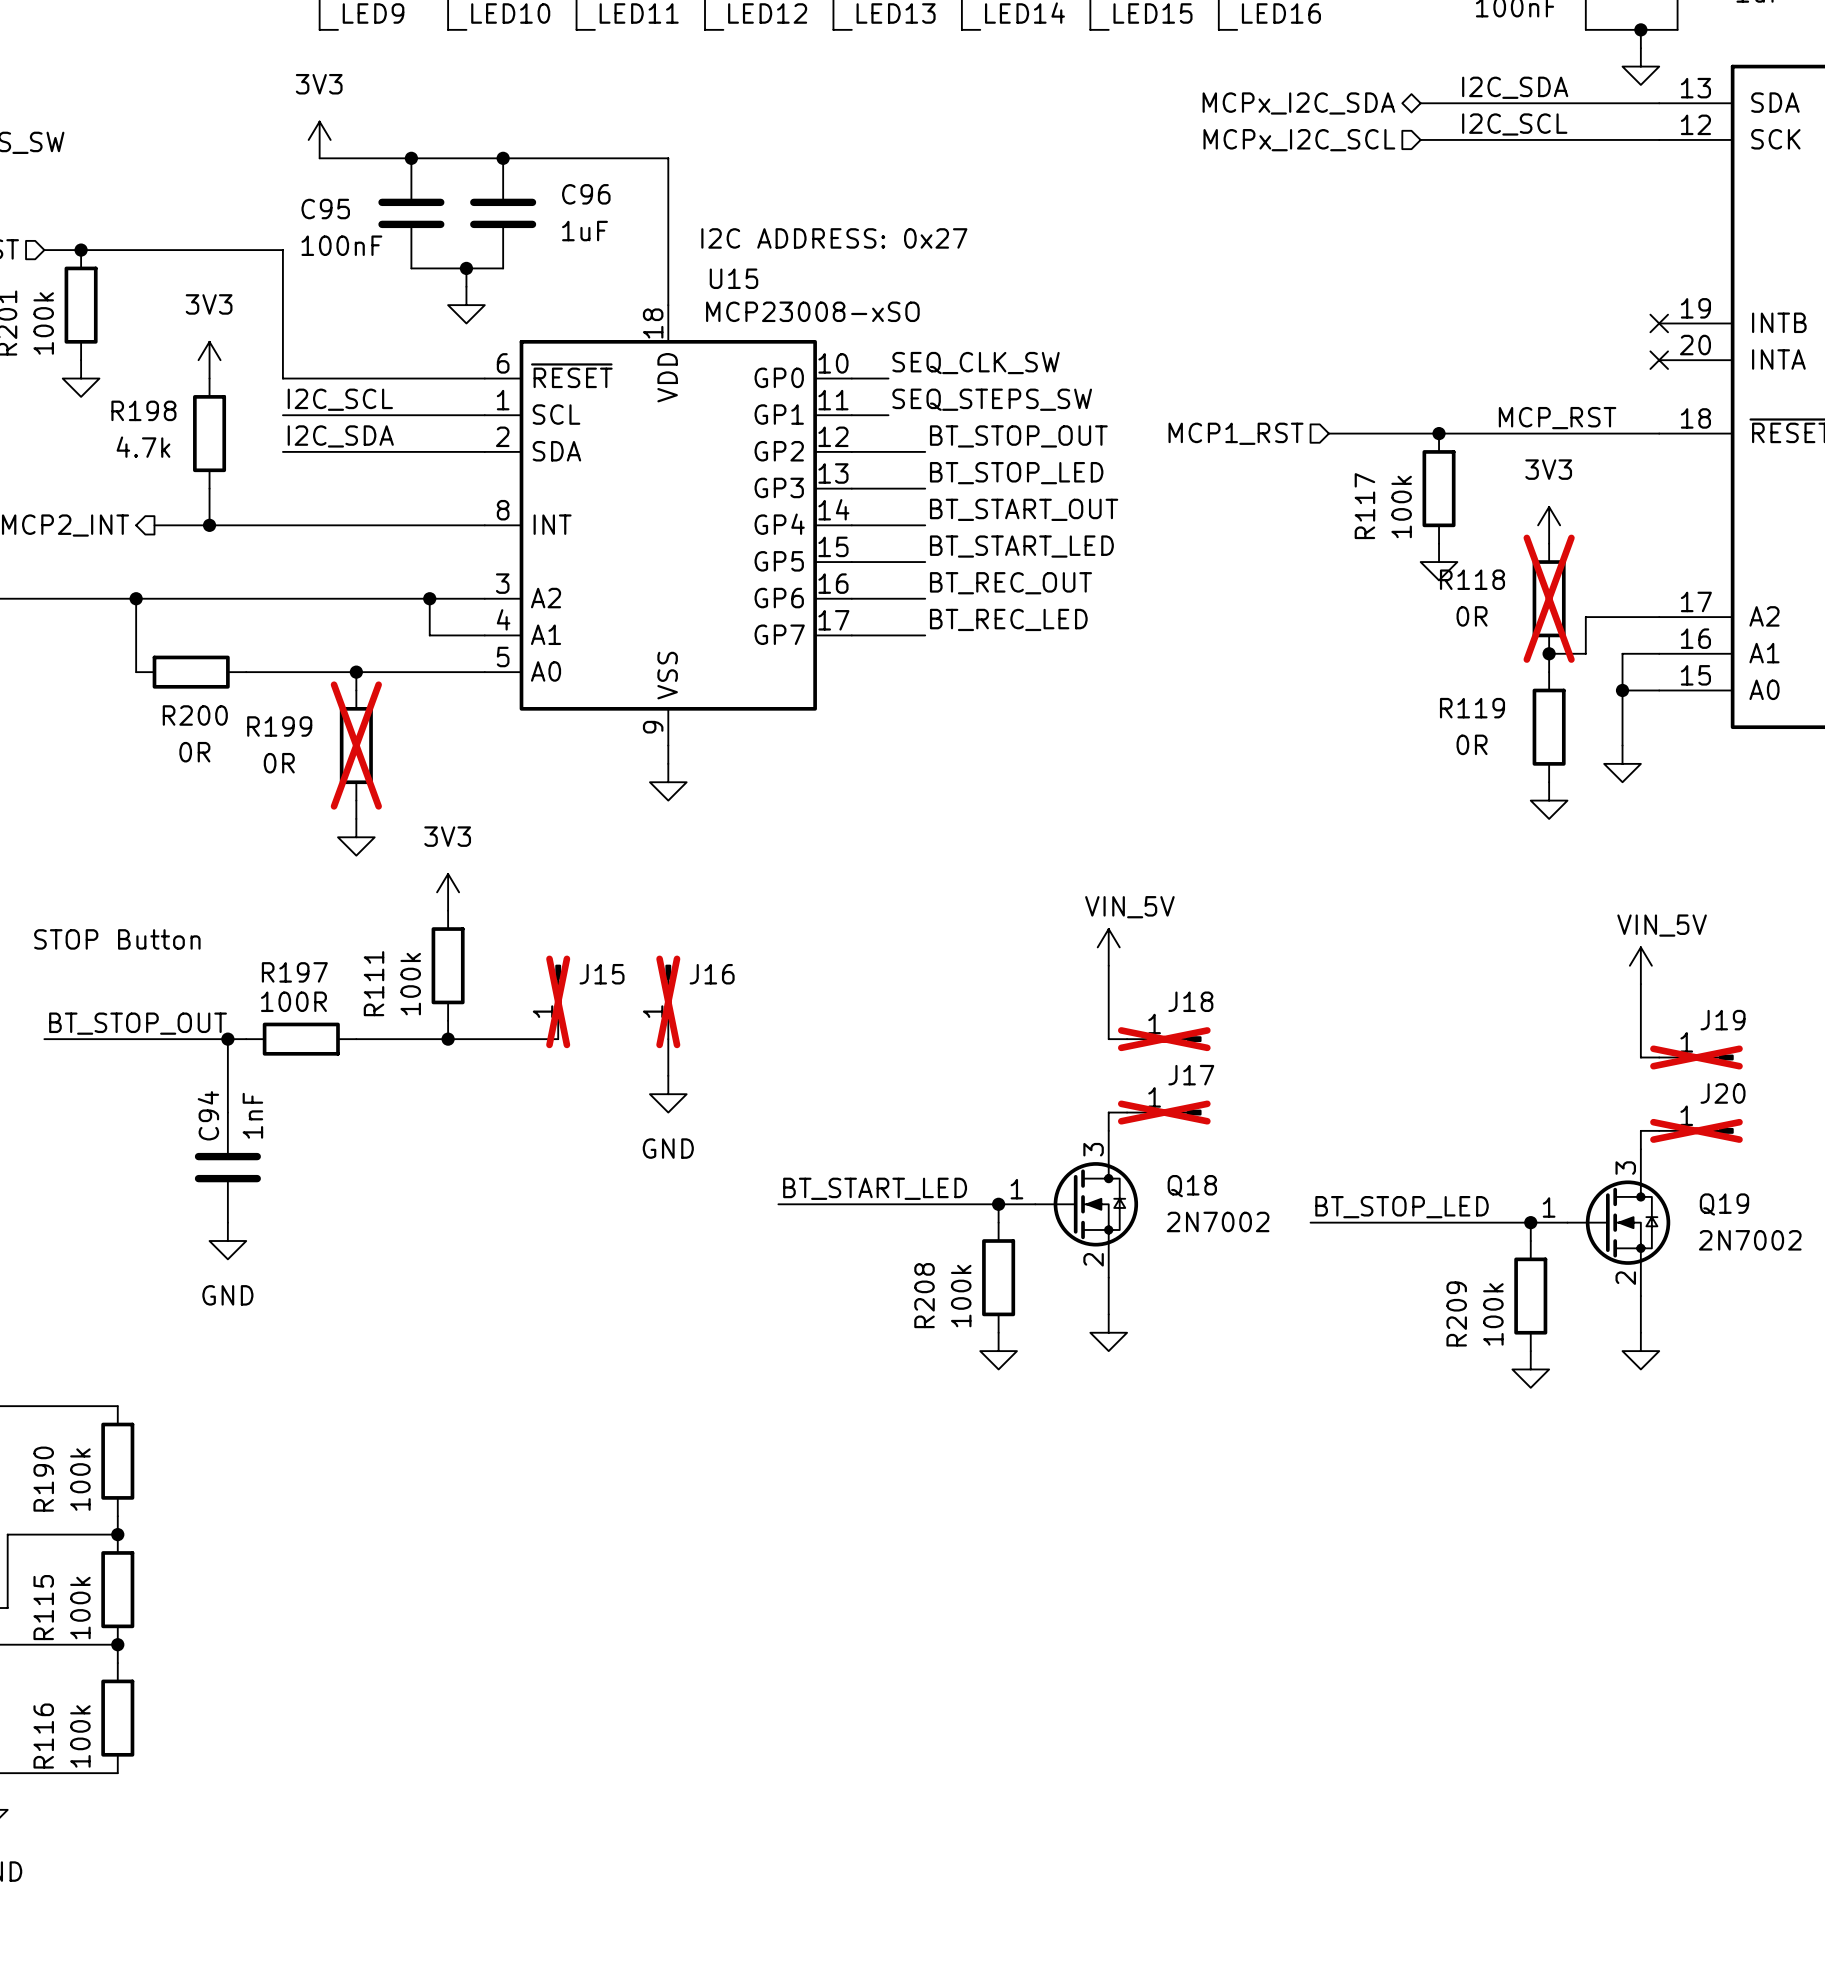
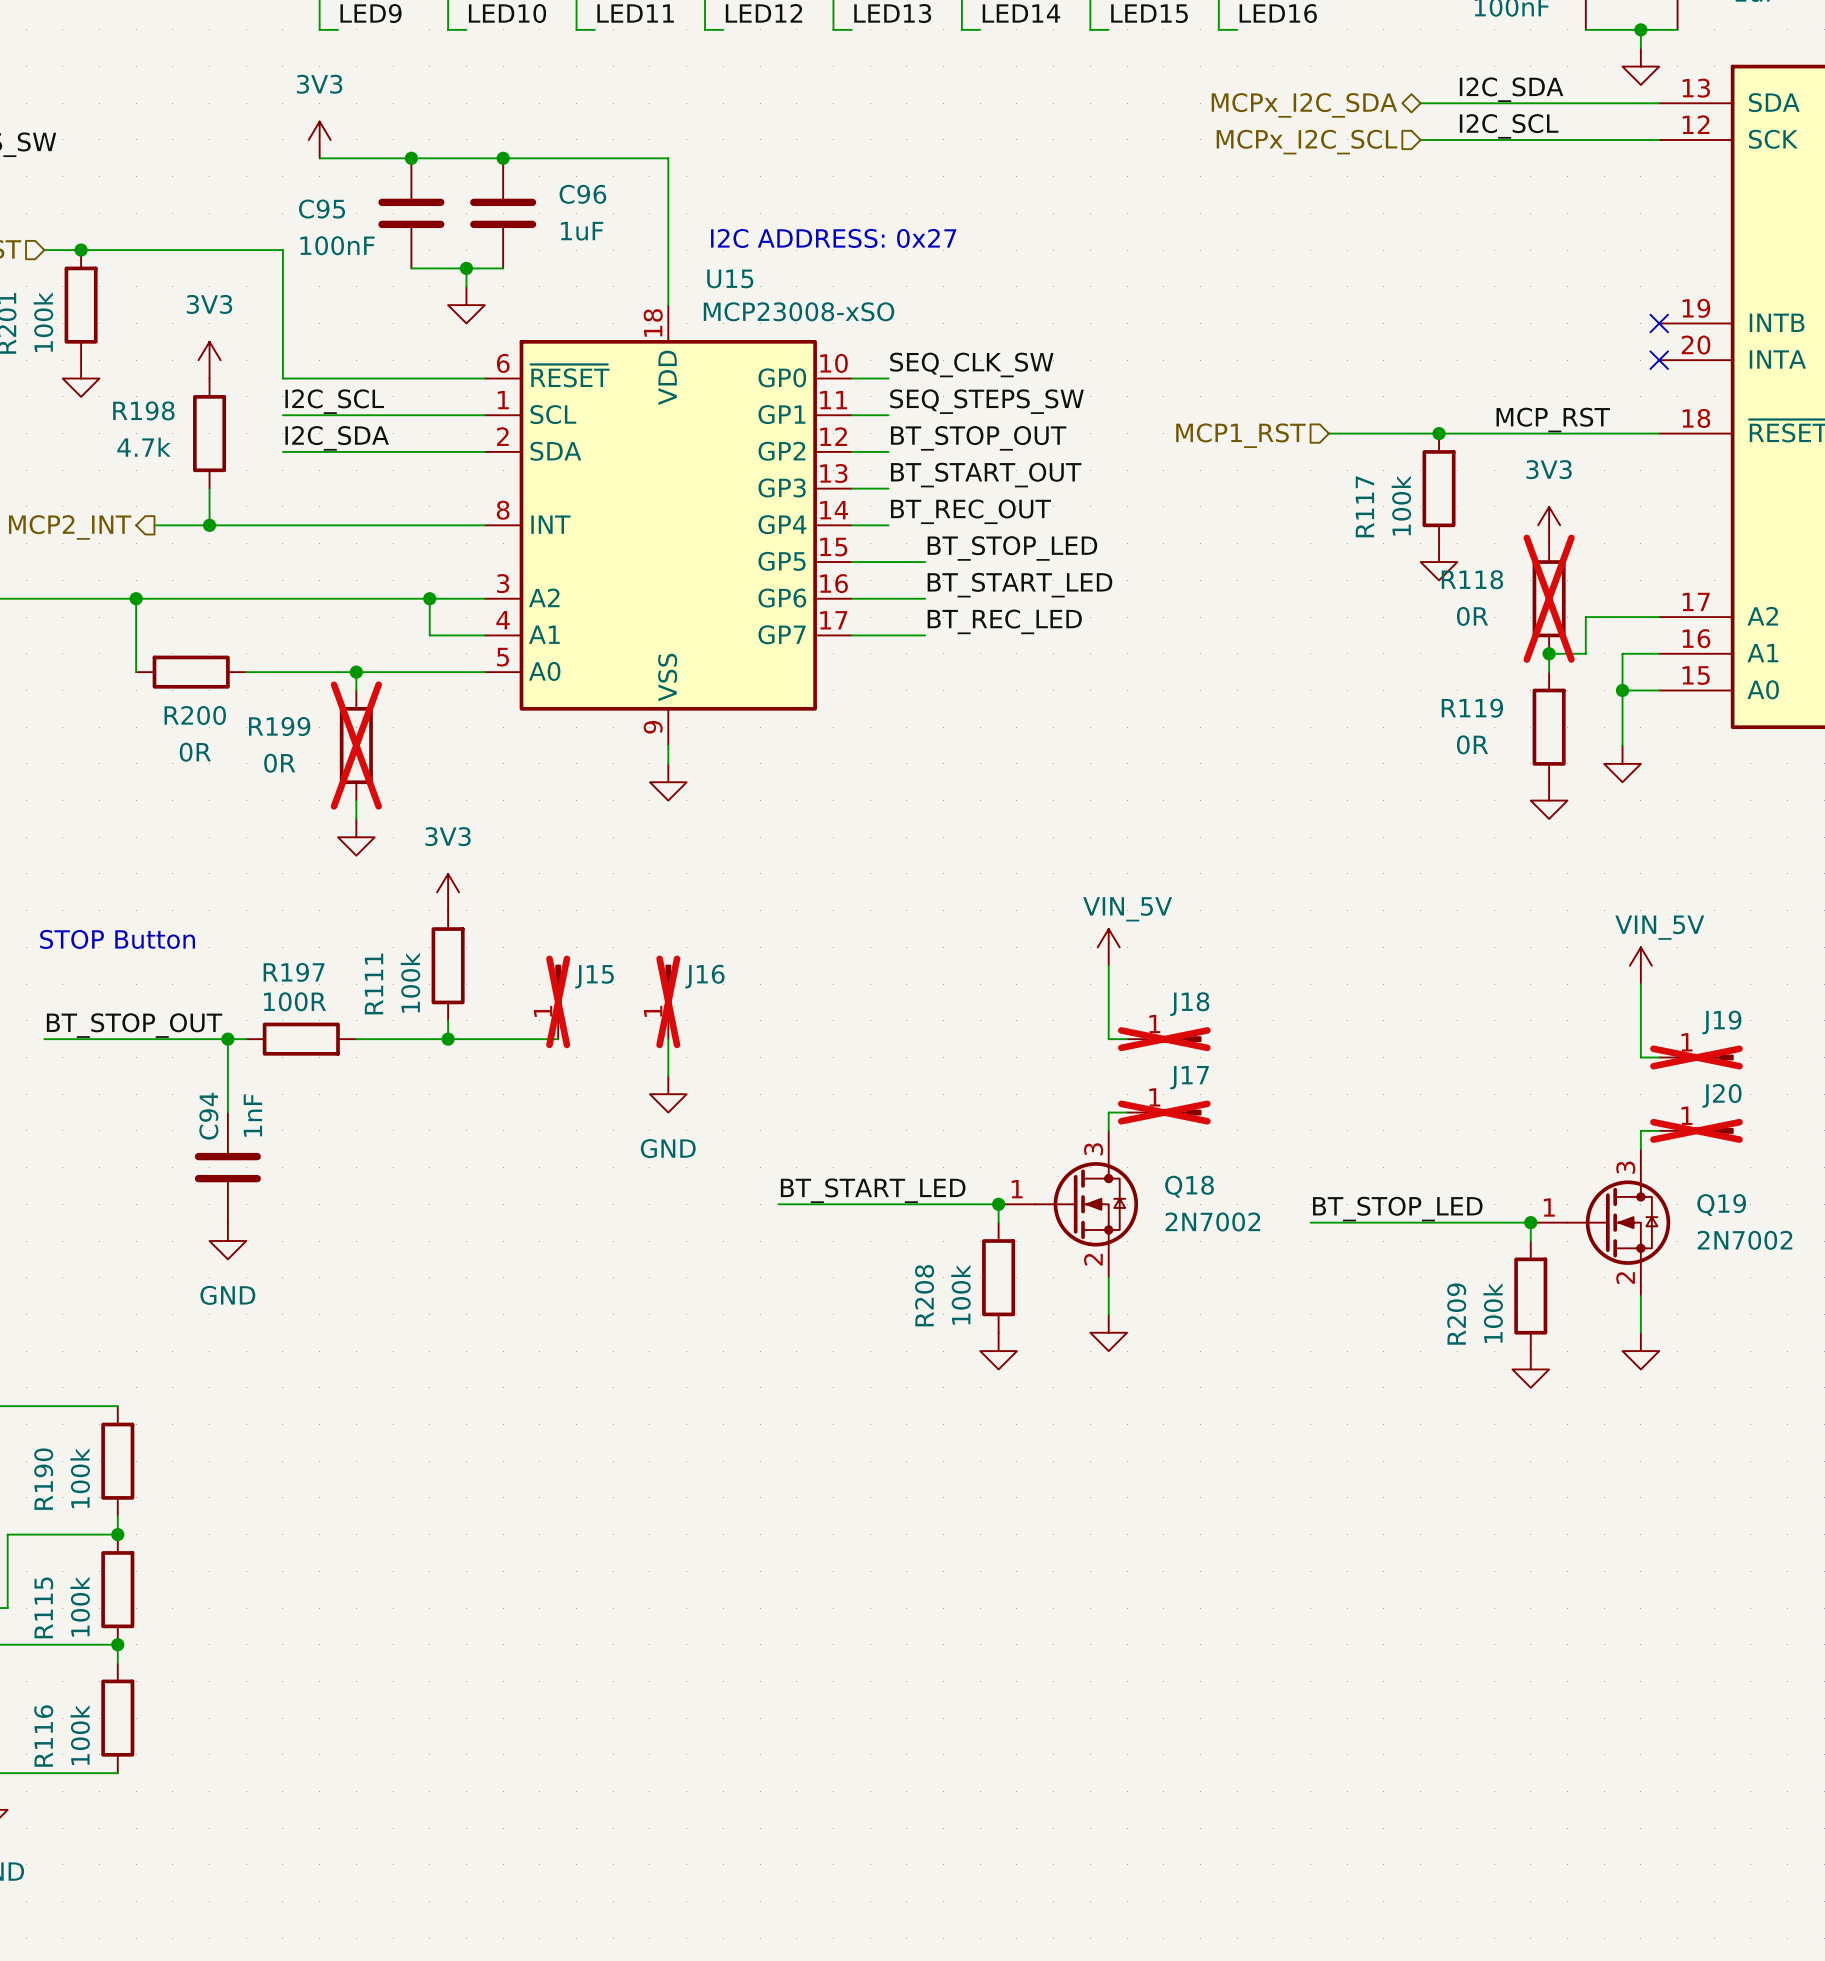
label position: BT_STOP_OUT (1018, 436) -> BT_STOP_OUT (978, 438)
wire: (888, 451) (925, 451) -> none
label: BT_STOP_LED (1016, 473) -> none
wire: (888, 488) (925, 488) -> none
label: none -> BT_REC_OUT (970, 511)
label position: BT_START_OUT (1024, 509) -> BT_START_OUT (986, 475)
wire: (888, 525) (925, 525) -> none
label: BT_START_LED (1021, 546) -> BT_STOP_LED (1012, 548)
label: BT_REC_OUT (1010, 583) -> BT_START_LED (1019, 585)

